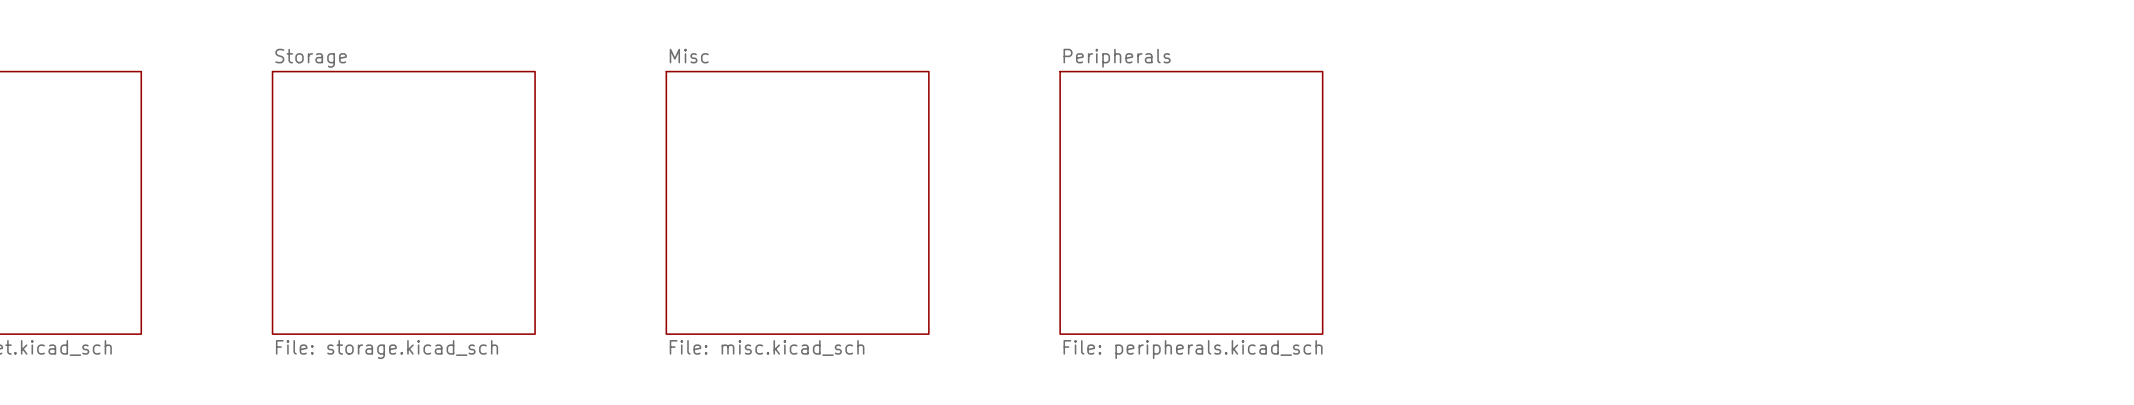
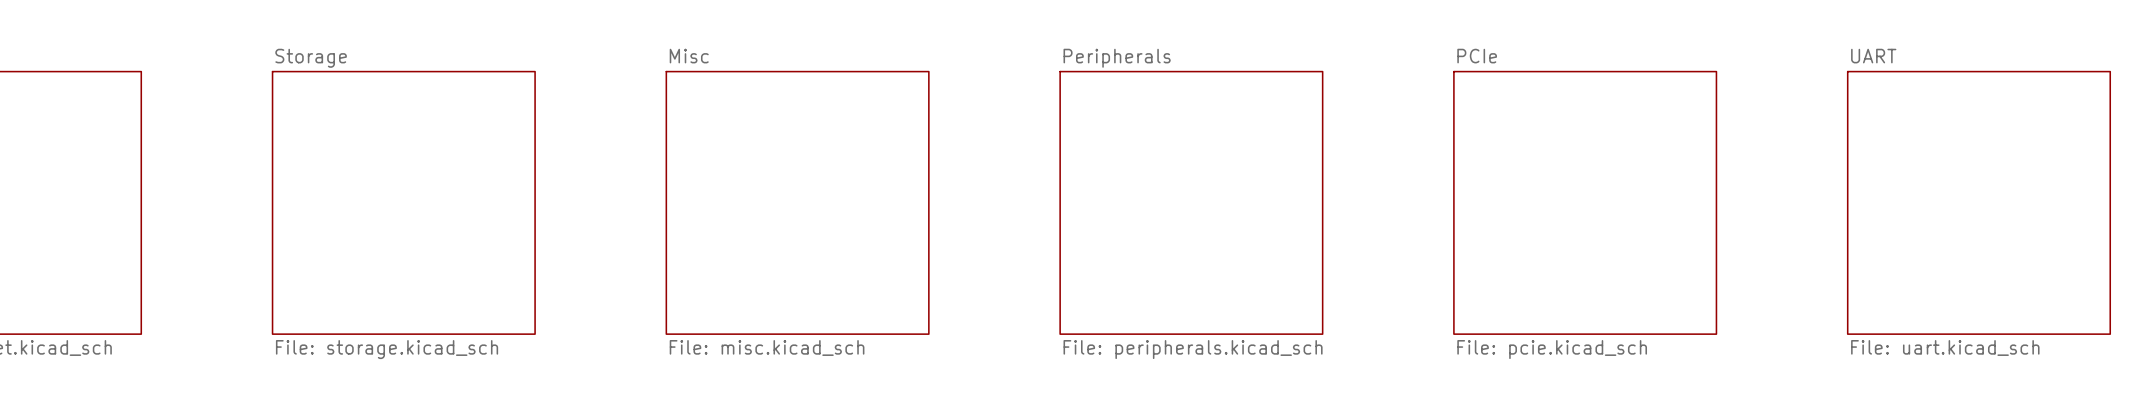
sheet PCIe: none -> File: pcie.kicad_sch (1585, 202)
sheet UART: none -> File: uart.kicad_sch (1978, 202)

